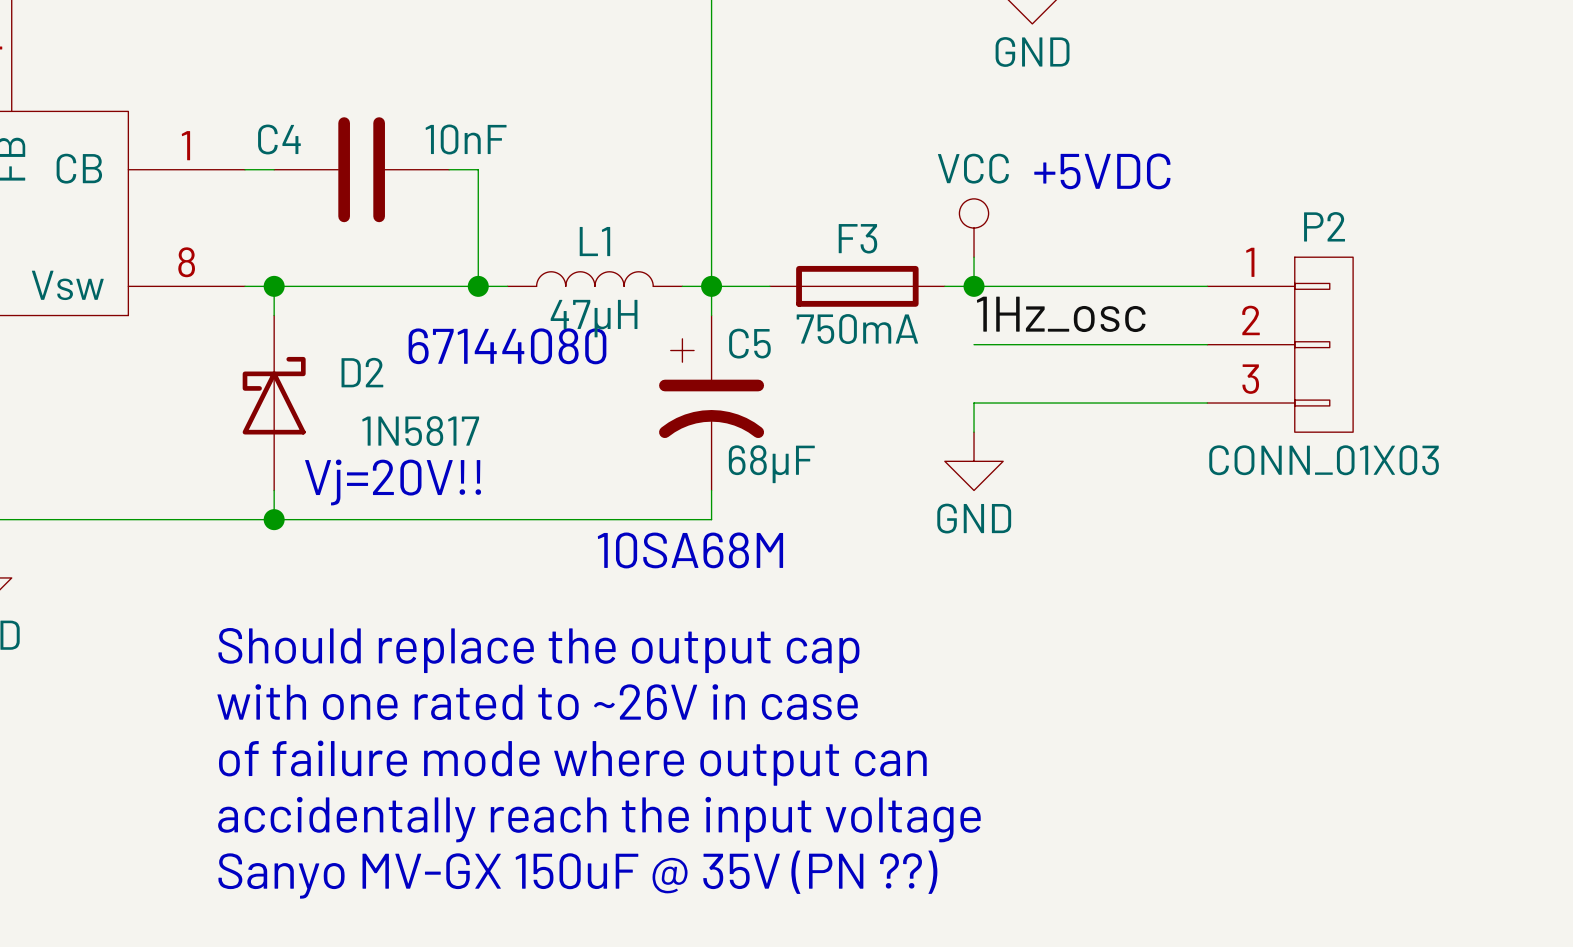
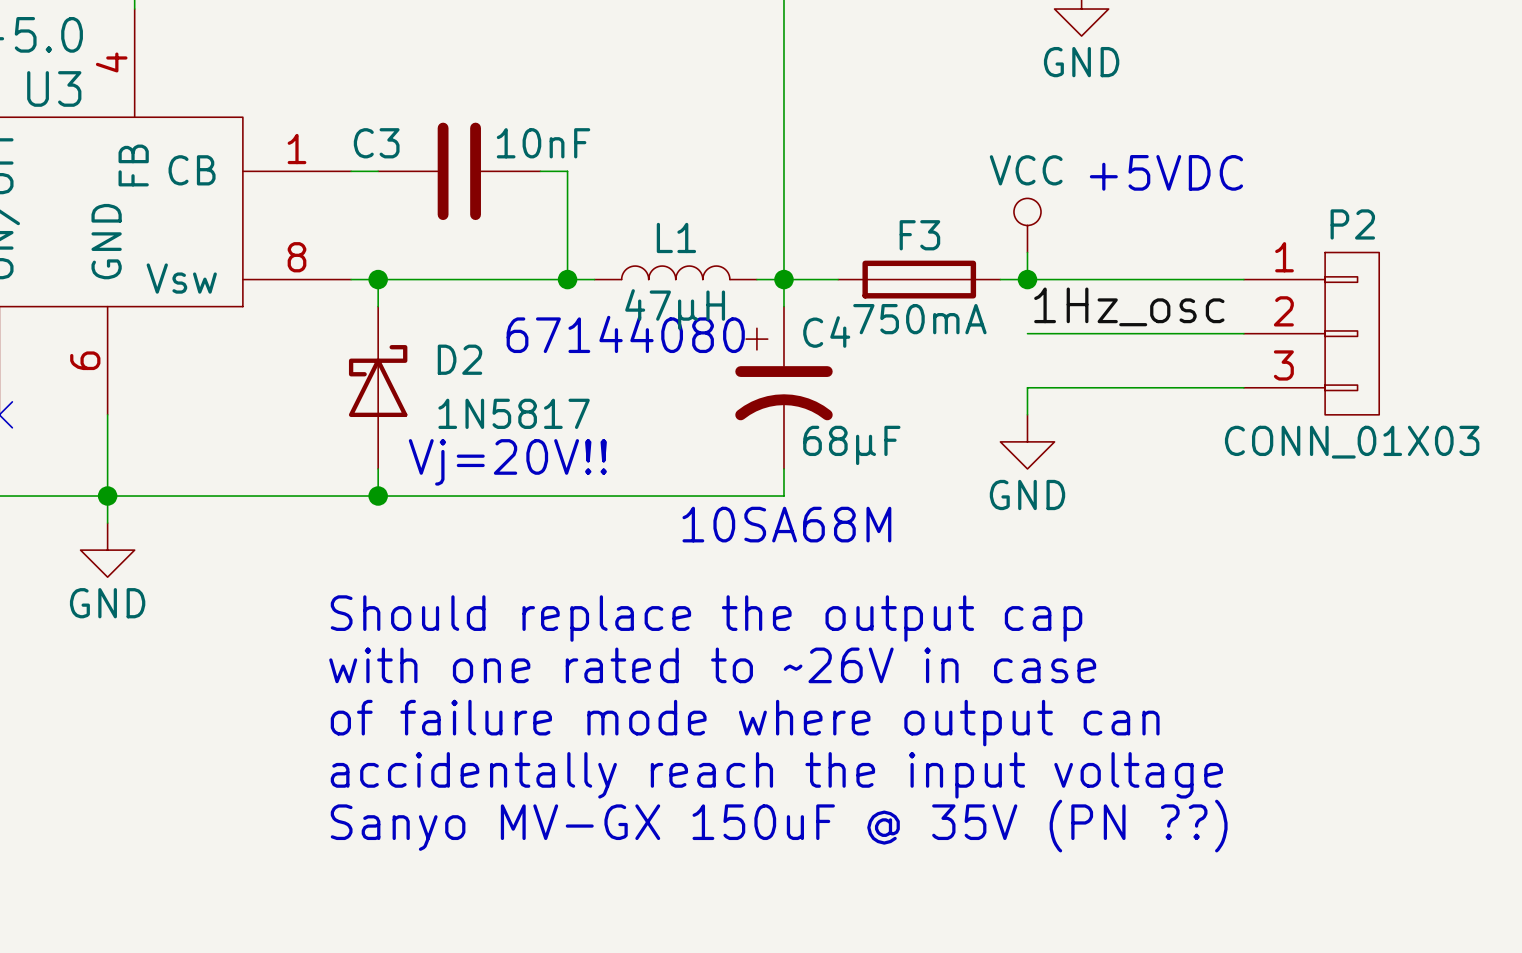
C4 name: C4 (279, 139) -> C3 (376, 143)
C5 name: C5 (749, 343) -> C4 (826, 332)

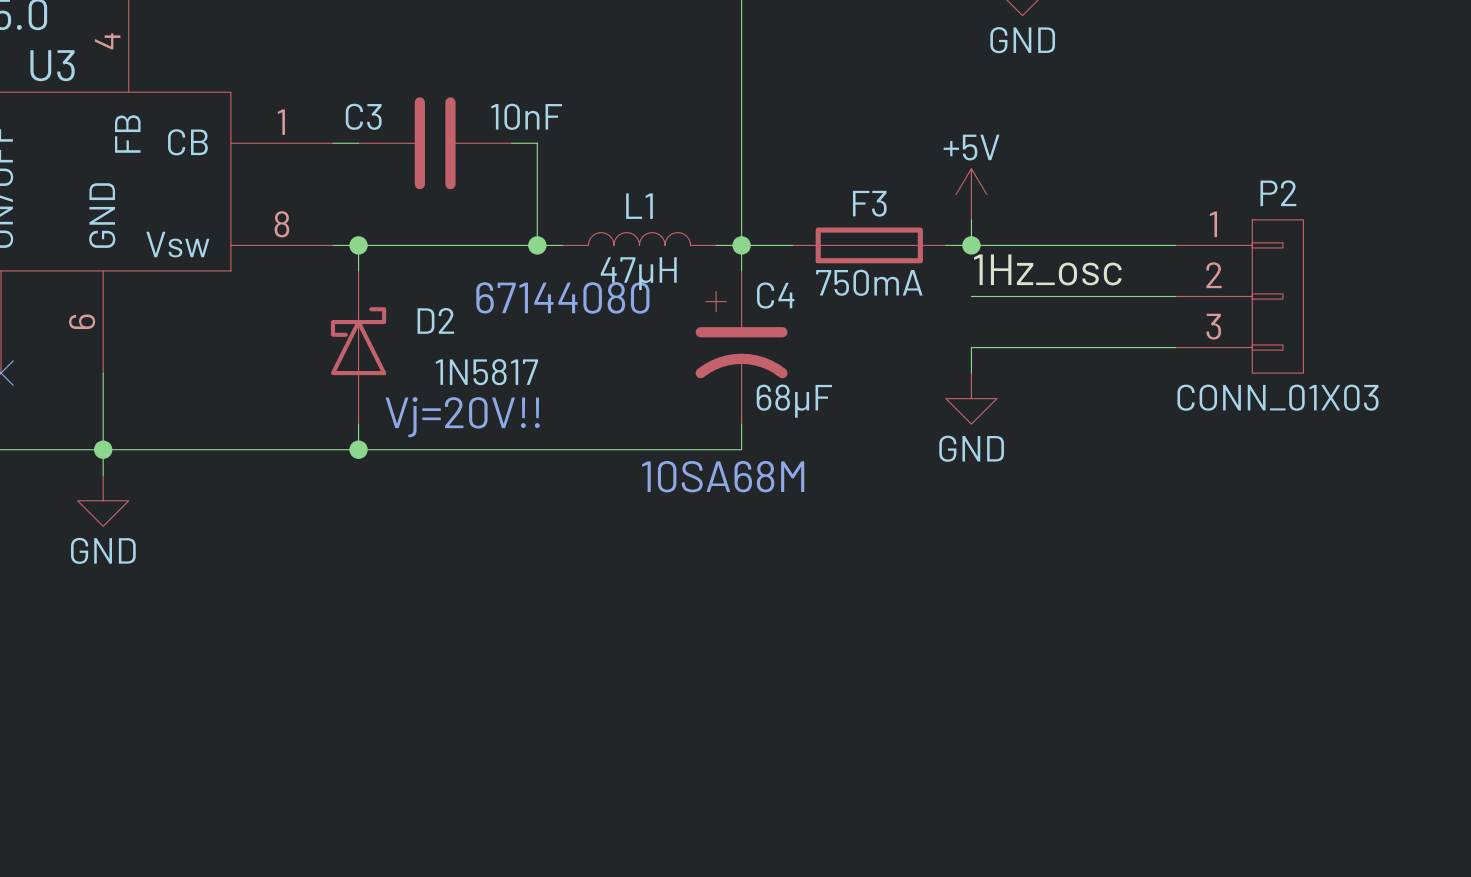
text: +5VDC (1166, 172) -> none
power symbol: VCC (1027, 225) -> +5V (971, 194)
text: Should replace the output cap (706, 618) -> none
text: with one rated to ~26V in case (712, 665) -> none
text: of failure mode where output can (745, 723) -> none
text: accidentally reach the input voltage (776, 775) -> none
text: Sanyo MV-GX 150uF @ 35V (PN ??) (779, 826) -> none

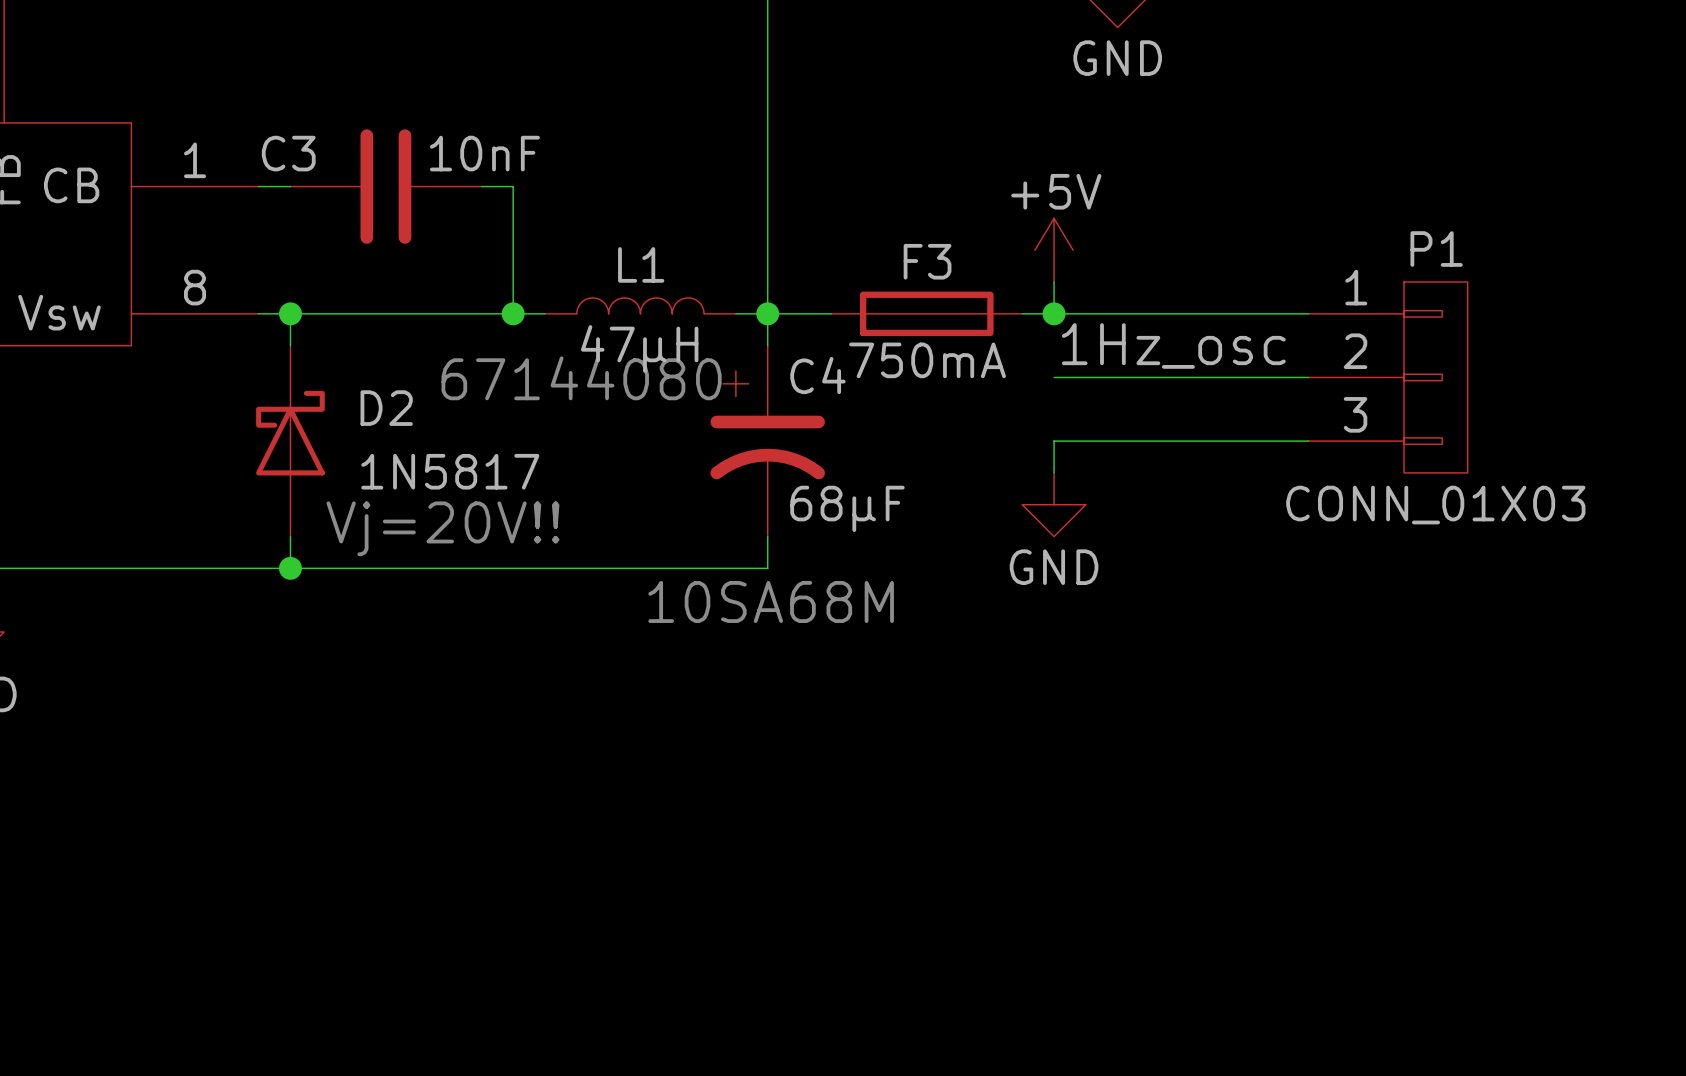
P2 name: P2 (1278, 193) -> P1 (1436, 249)

